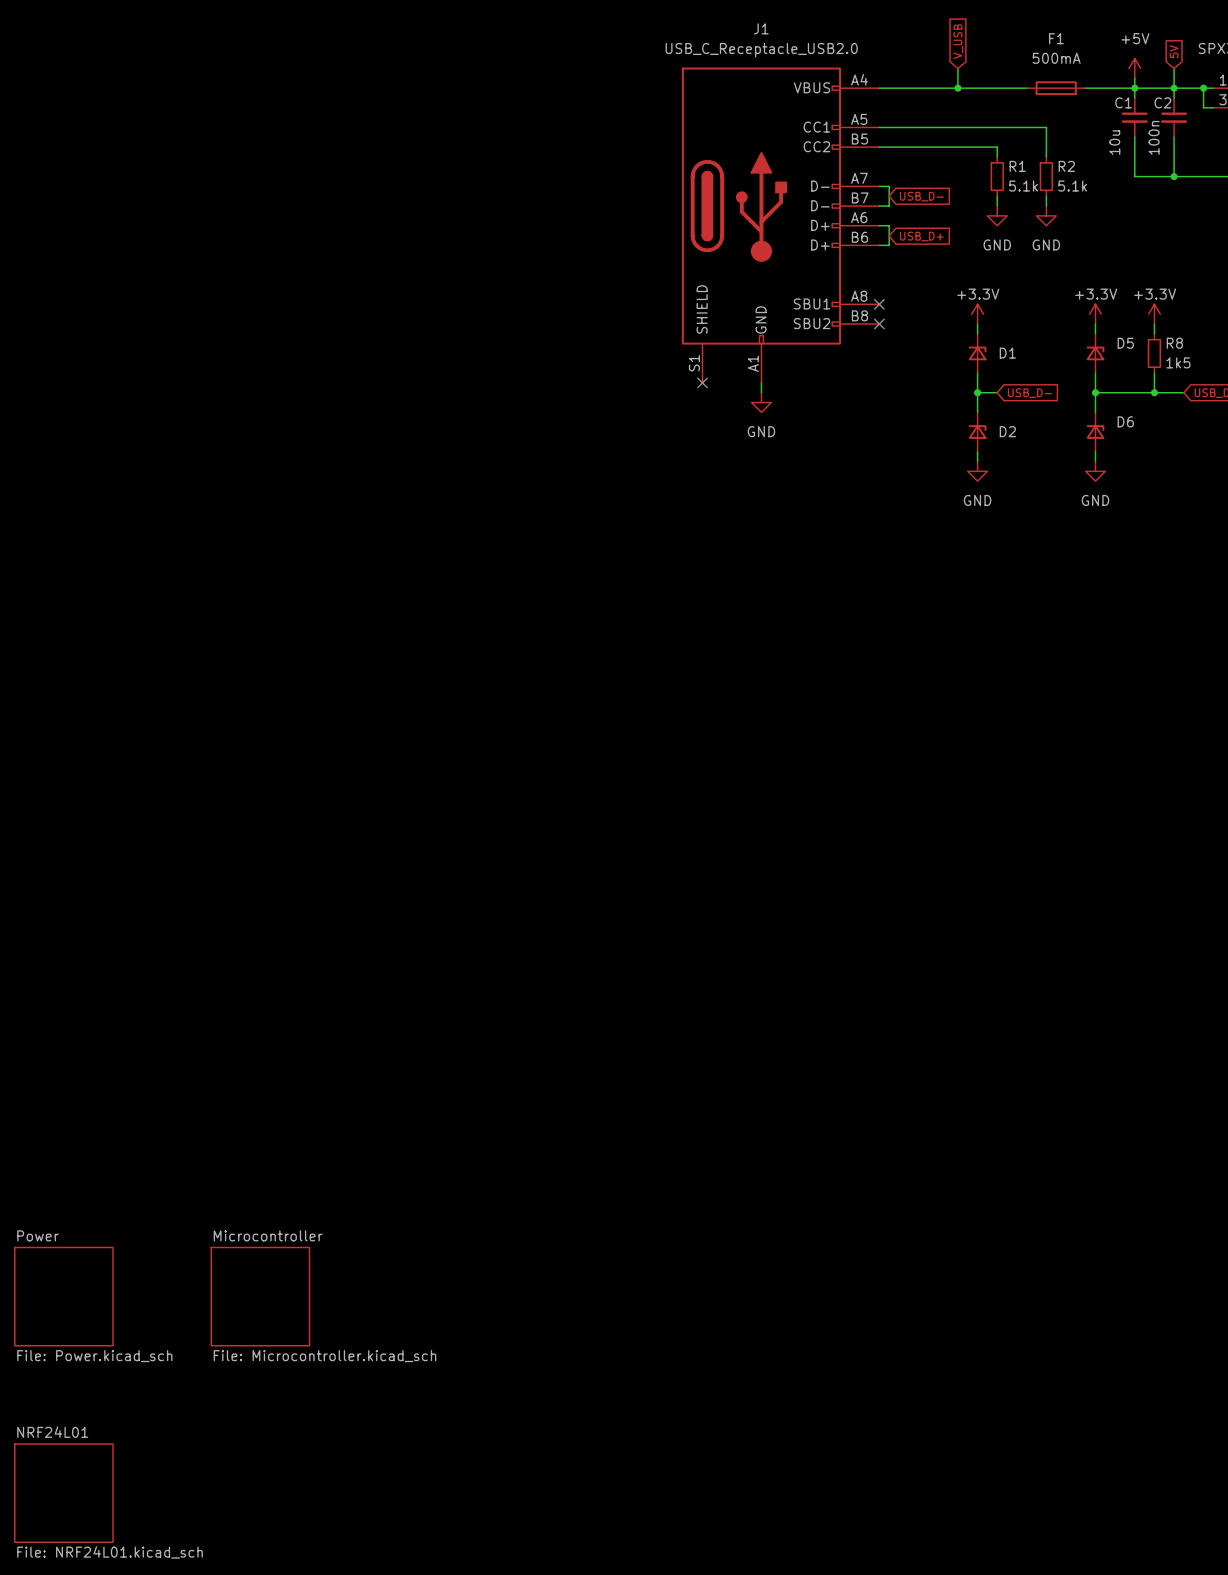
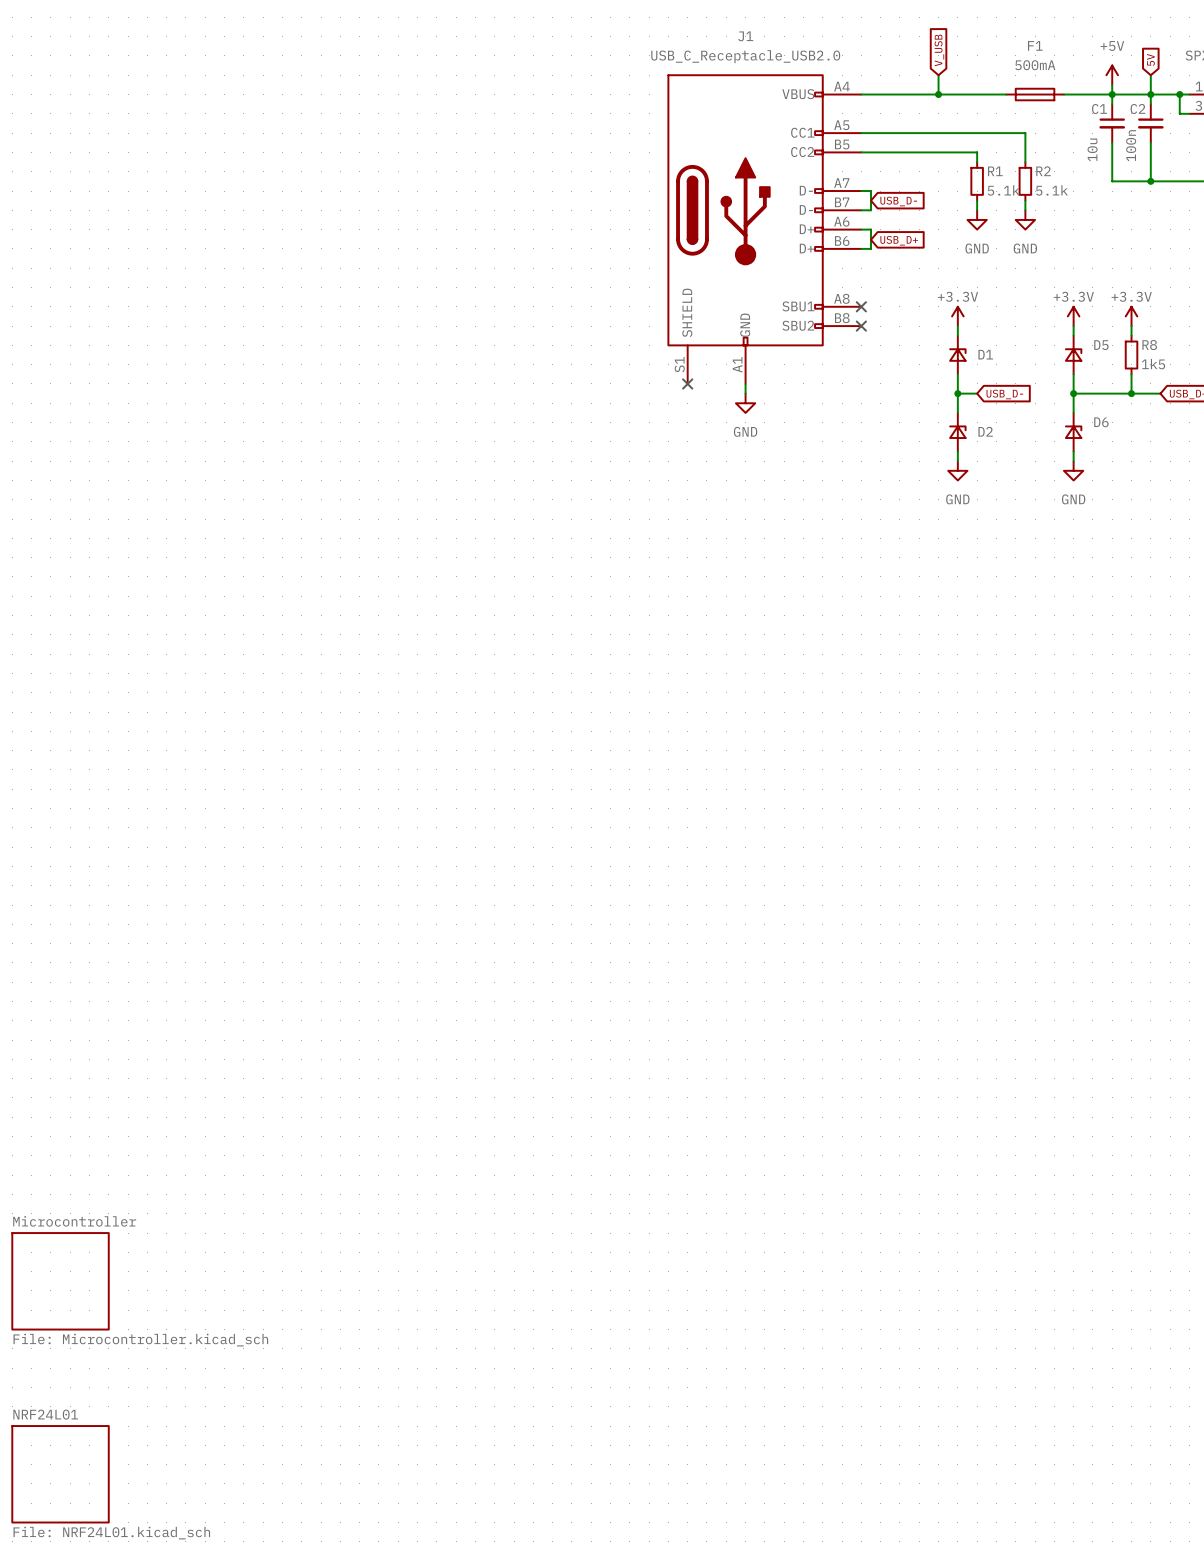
sheet Power name: Power (38, 1235) -> Microcontroller (74, 1221)
sheet Microcontroller: File: Microcontroller.kicad_sch (260, 1296) -> none
sheet Power value: File: Power.kicad_sch (94, 1356) -> File: Microcontroller.kicad_sch (140, 1340)

